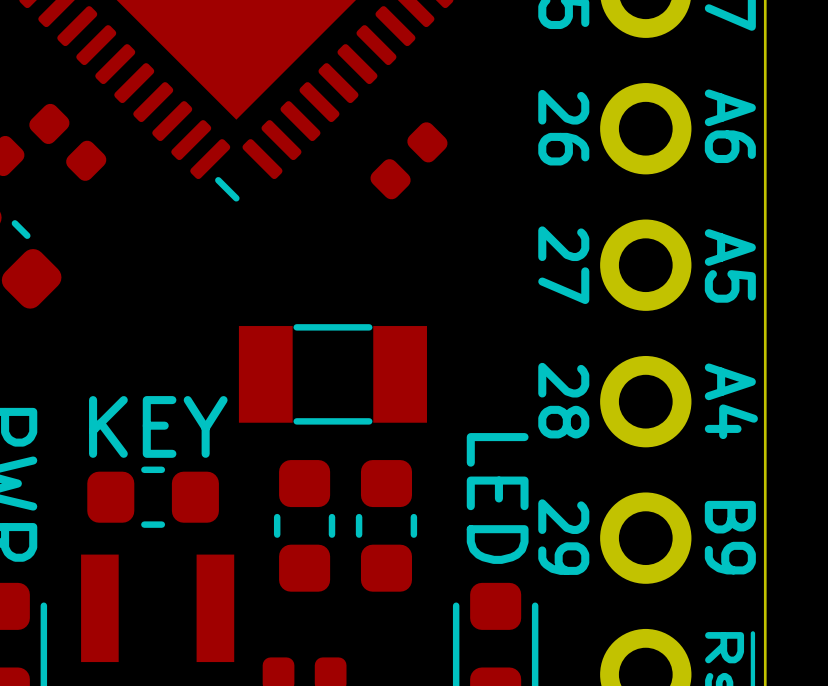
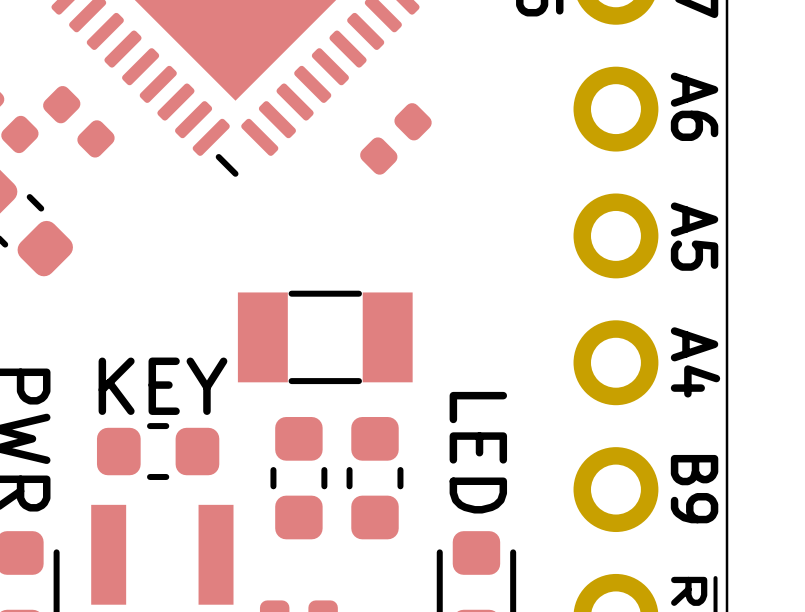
text: 26 (563, 127) -> none
text: 27 (563, 265) -> none
text: 28 (563, 400) -> none
text: 29 (563, 537) -> none

